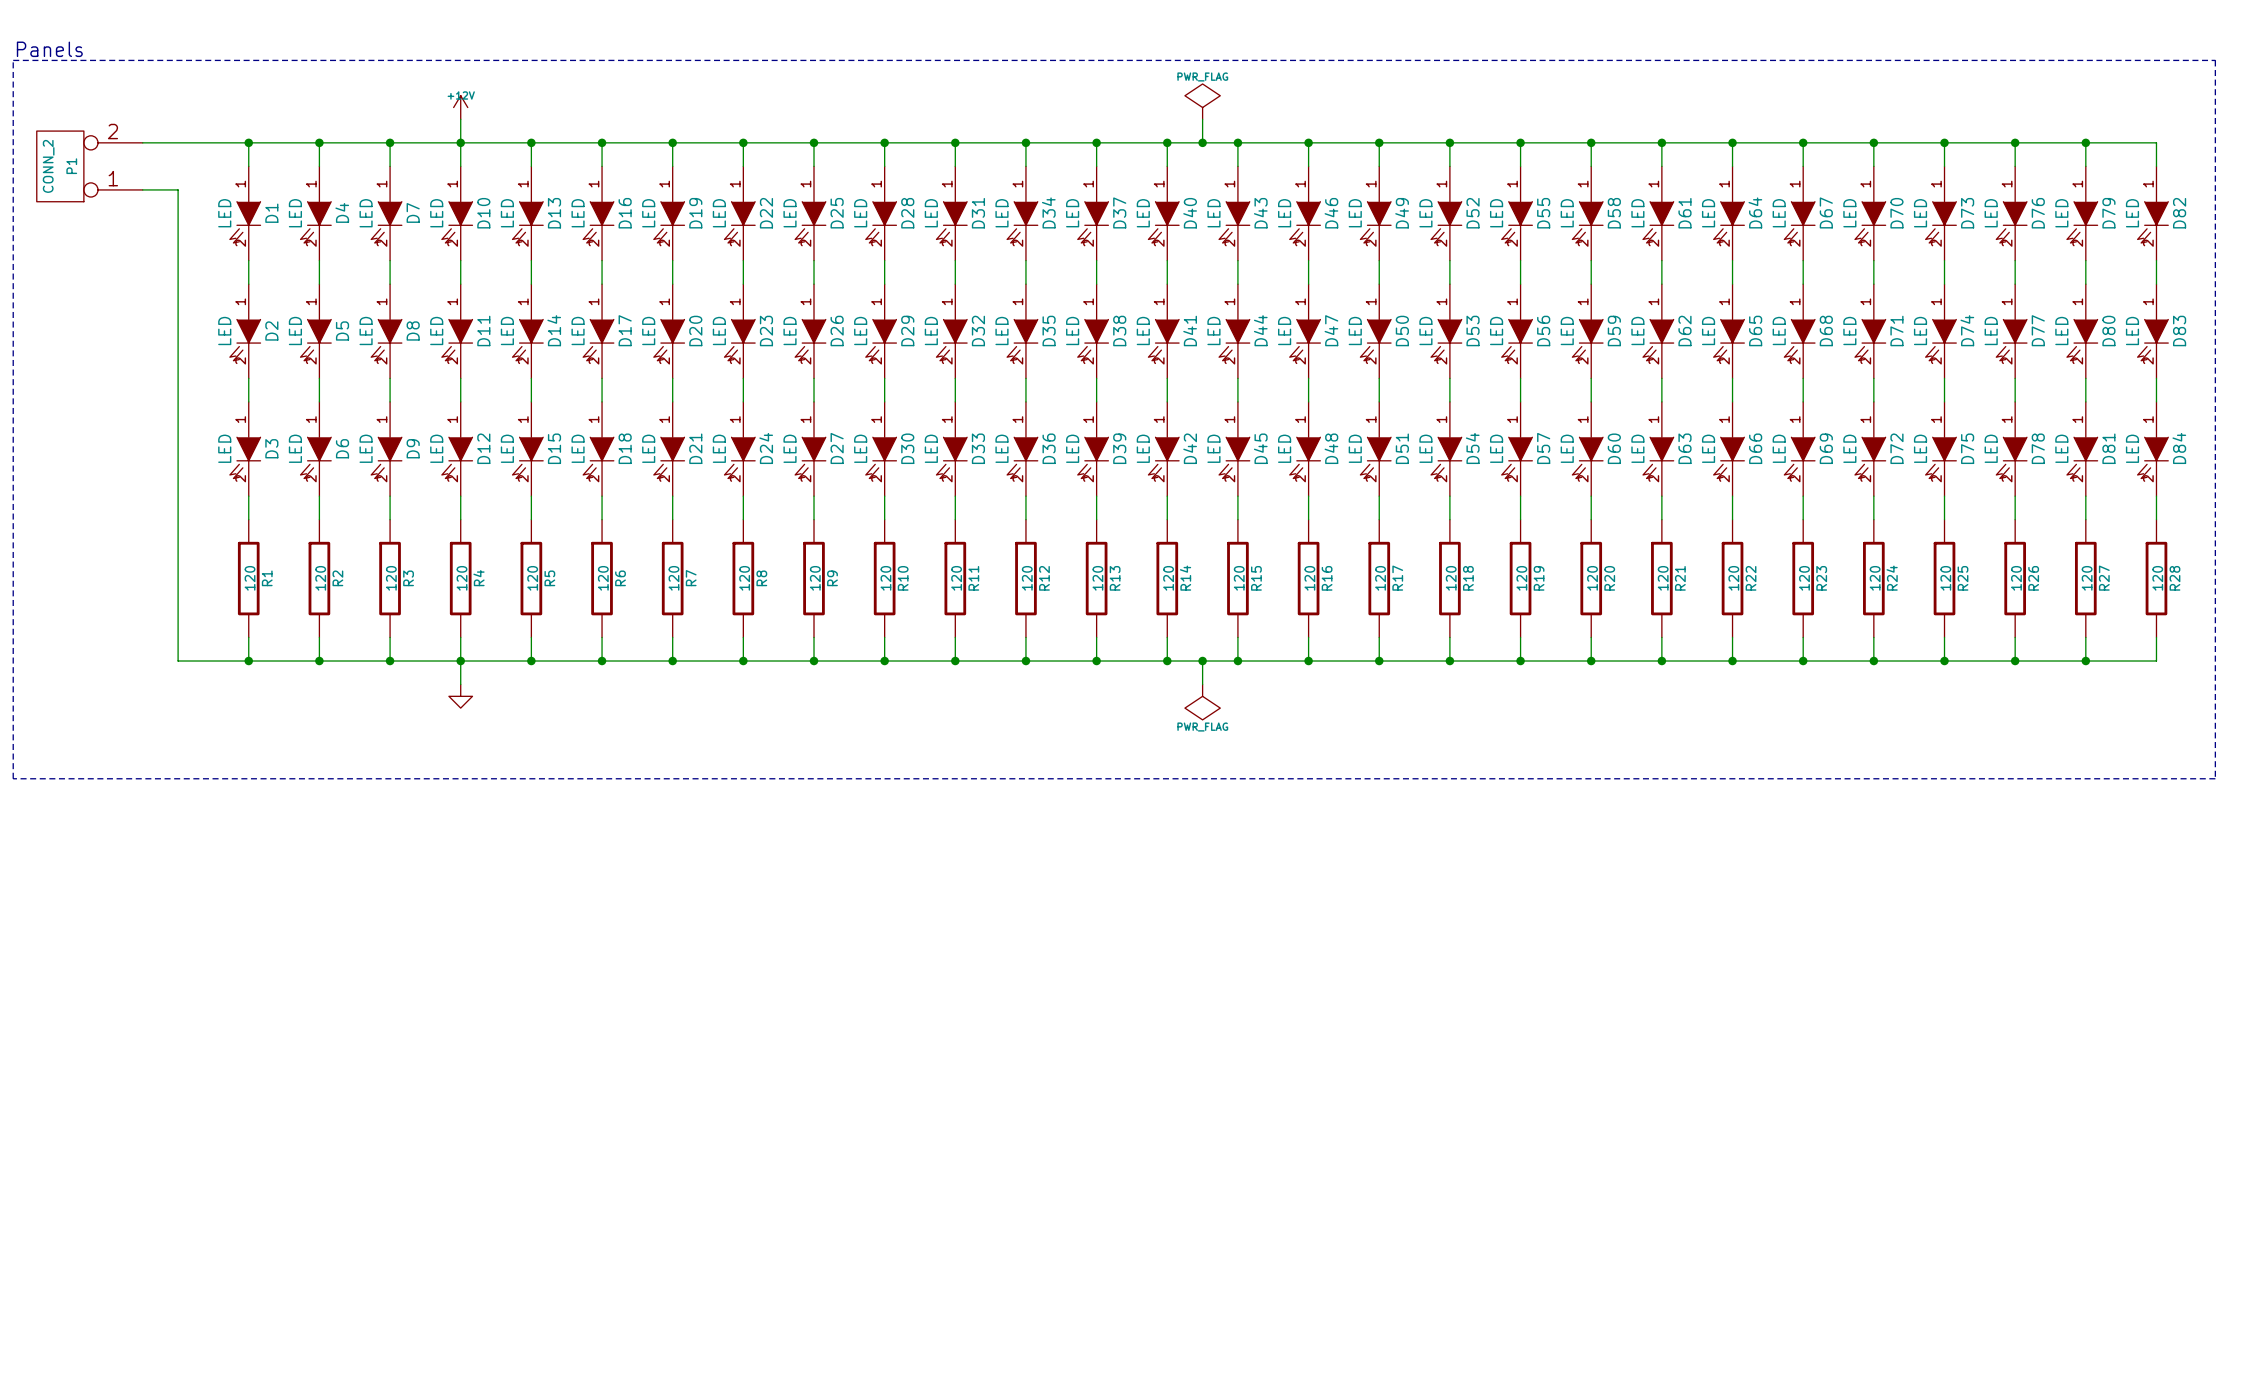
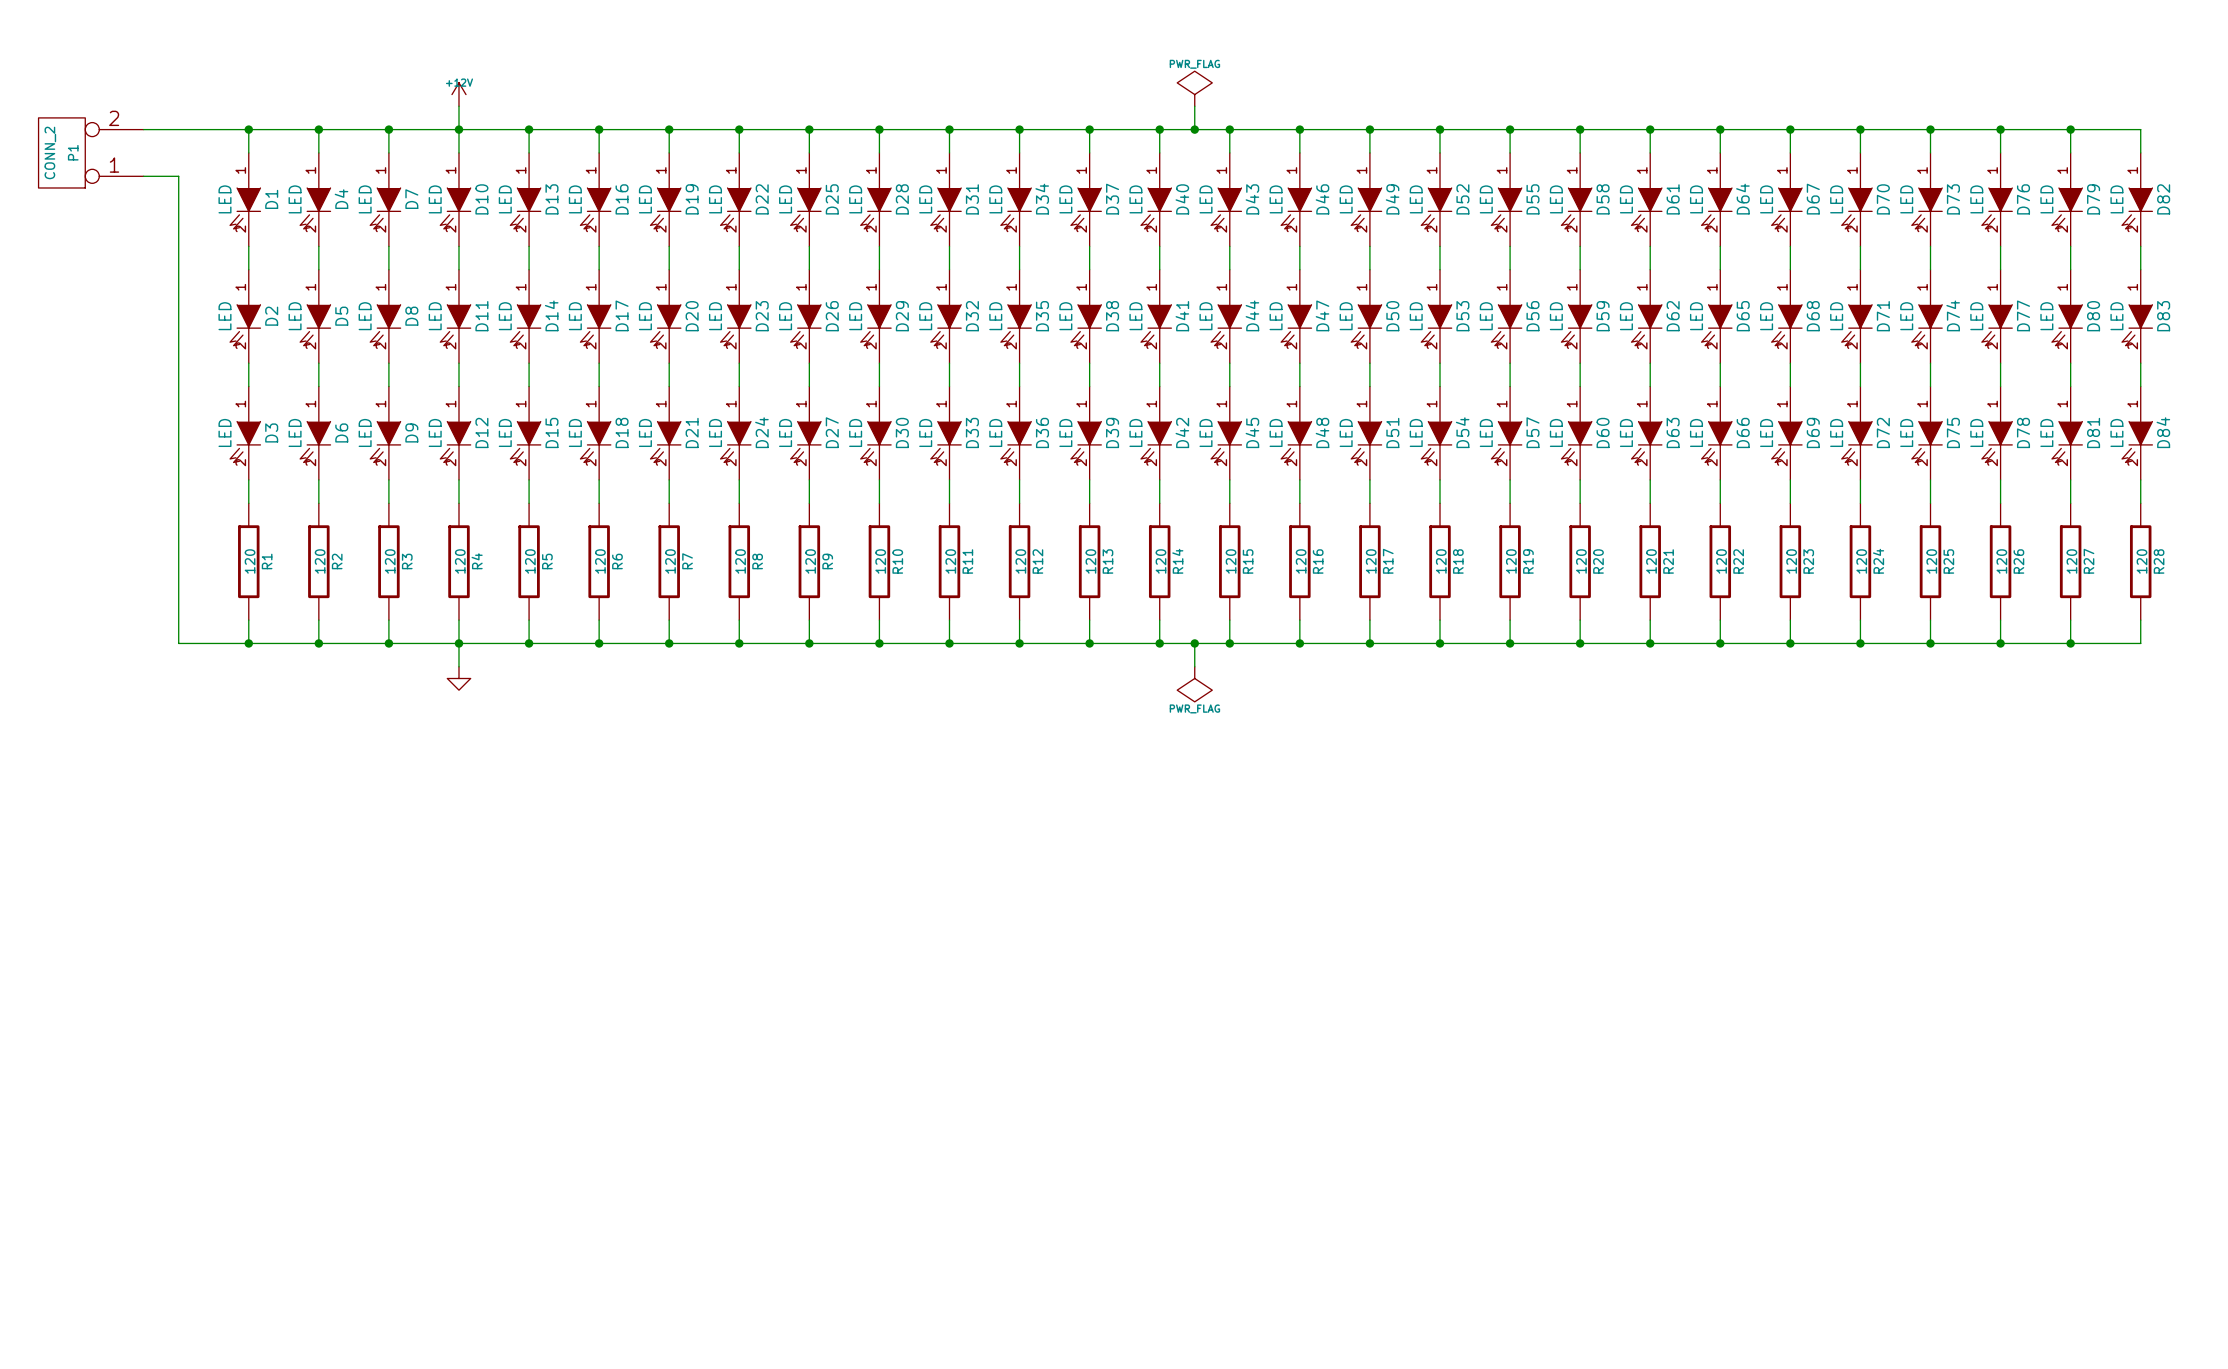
text: Panels (49, 49) -> none
line: (13, 60) (2215, 60) (2215, 778) (13, 778) (13, 60) -> none

